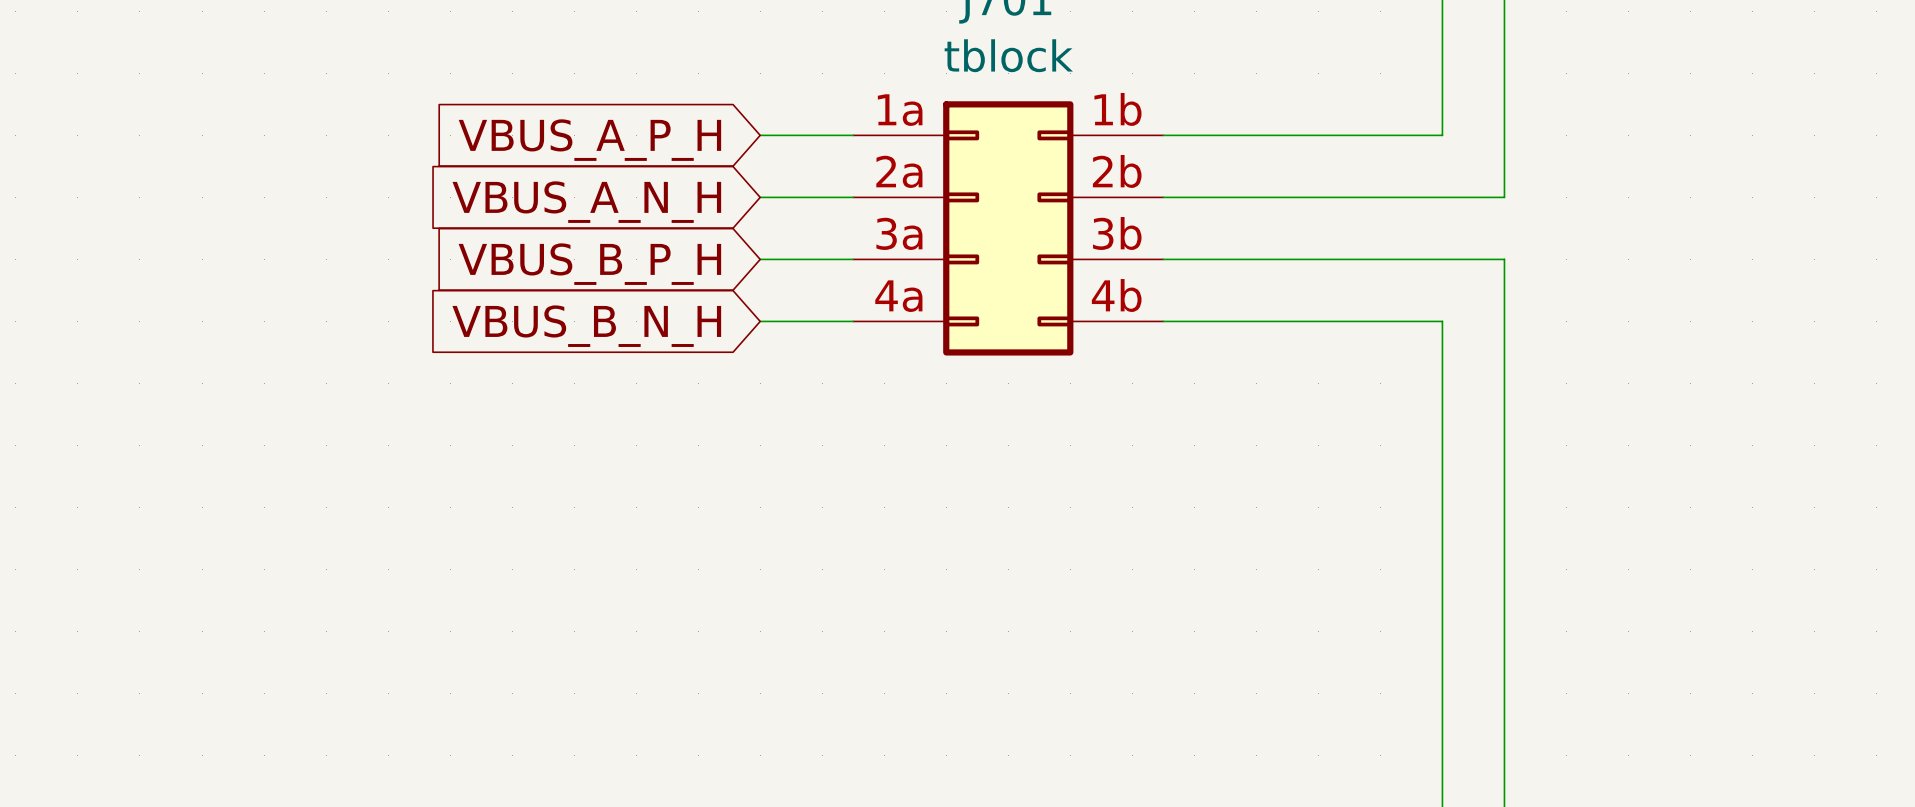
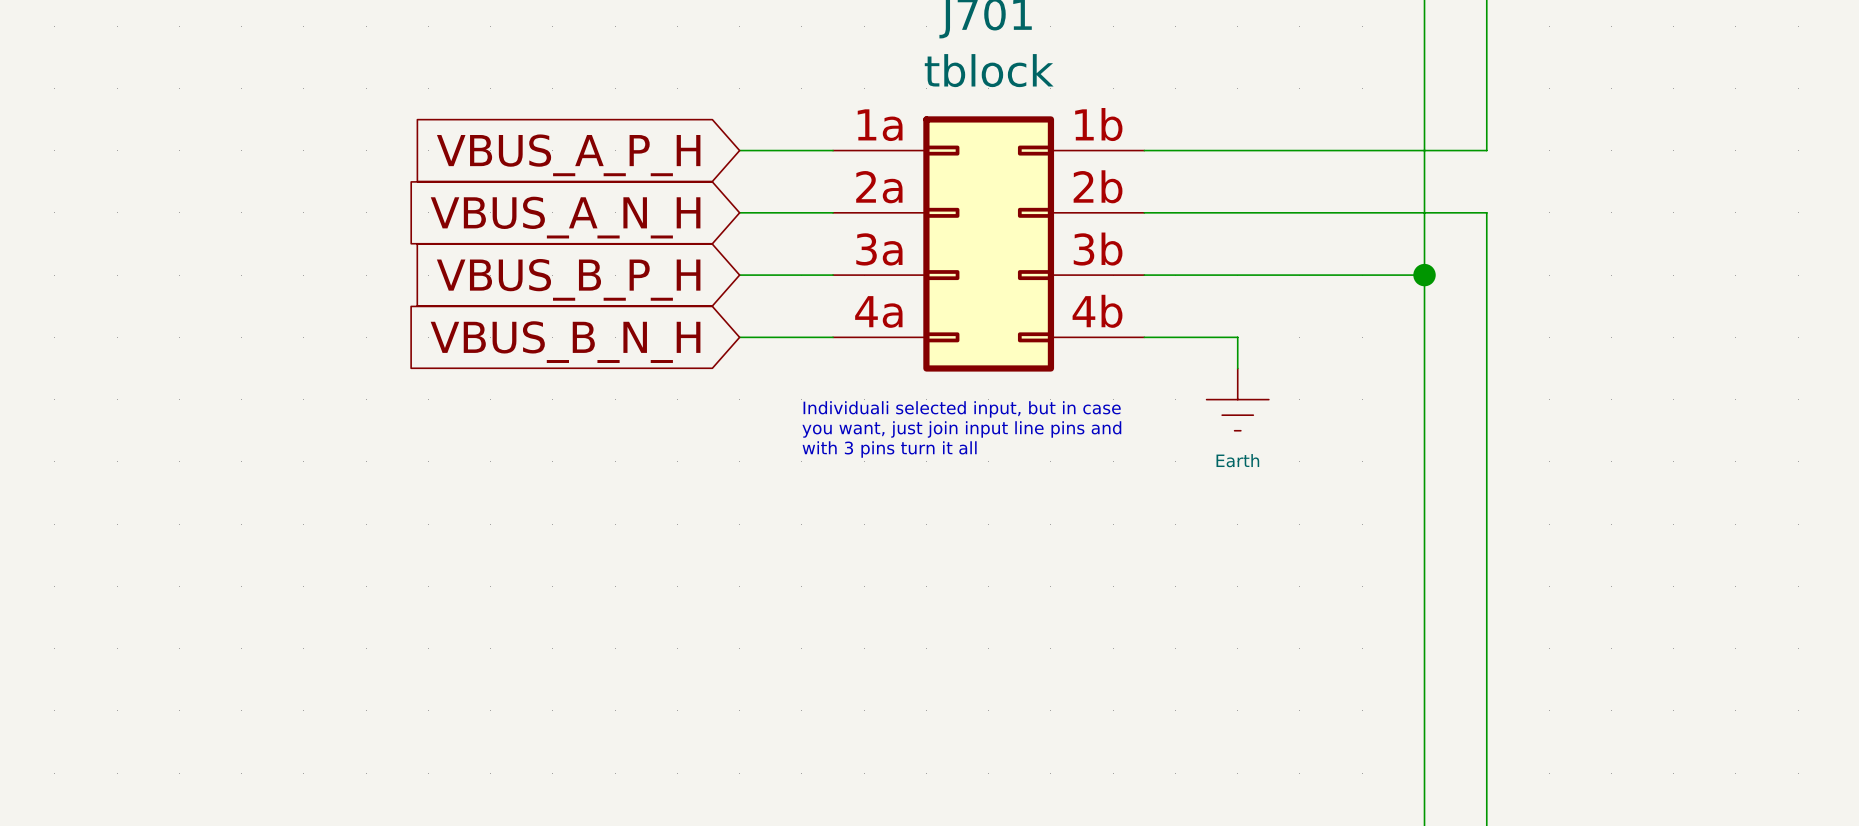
wire: (1504, 135) (1504, 197) -> (1486, 150) (1424, 150) (1424, 337)
wire: (1442, 259) (1504, 259) -> (1486, 212) (1486, 275)
junction: none -> (1424, 275)
wire: (1256, 321) (1442, 321) -> (1237, 337) (1237, 368)
power symbol: none -> Earth (1237, 399)
text: none -> Individuali selected input, but in case (962, 409)
text: none -> you want, just join input line pins and (961, 429)
text: none -> with 3 pins turn it all (889, 449)

